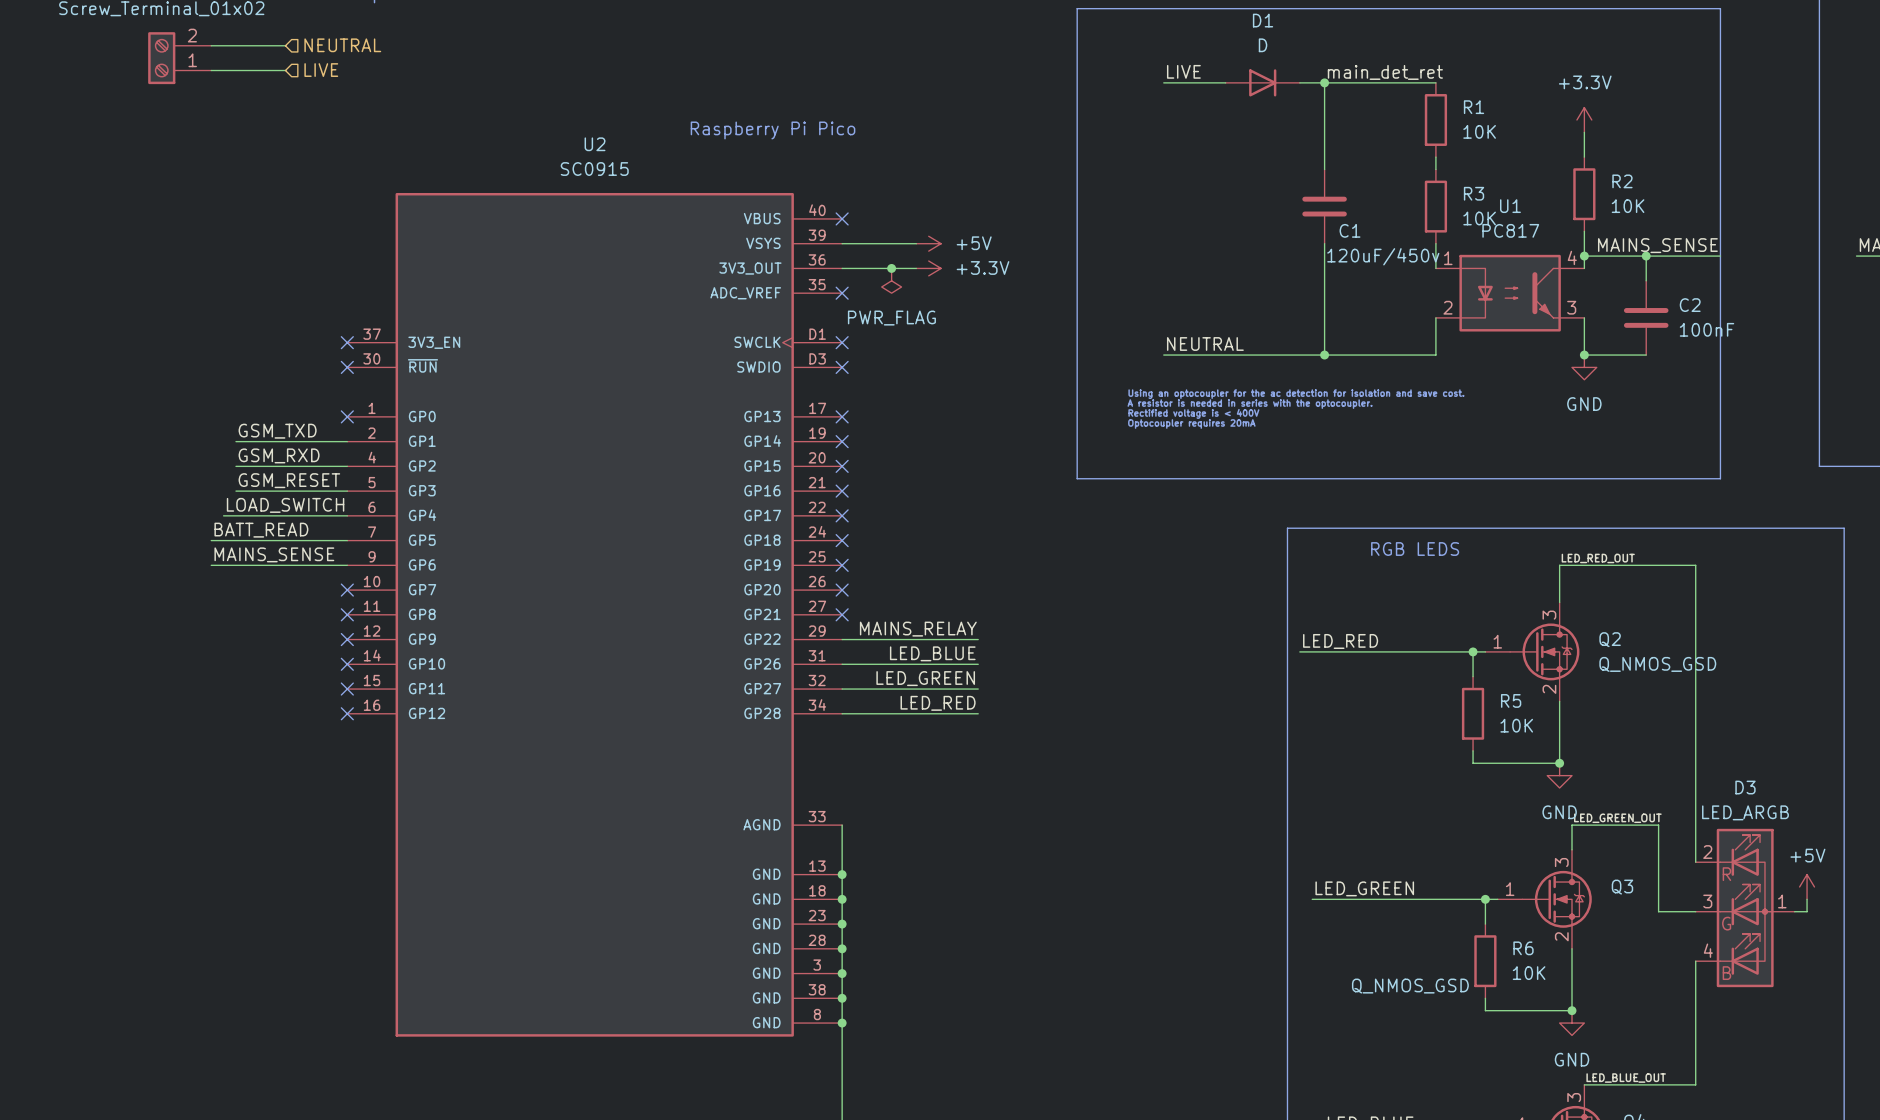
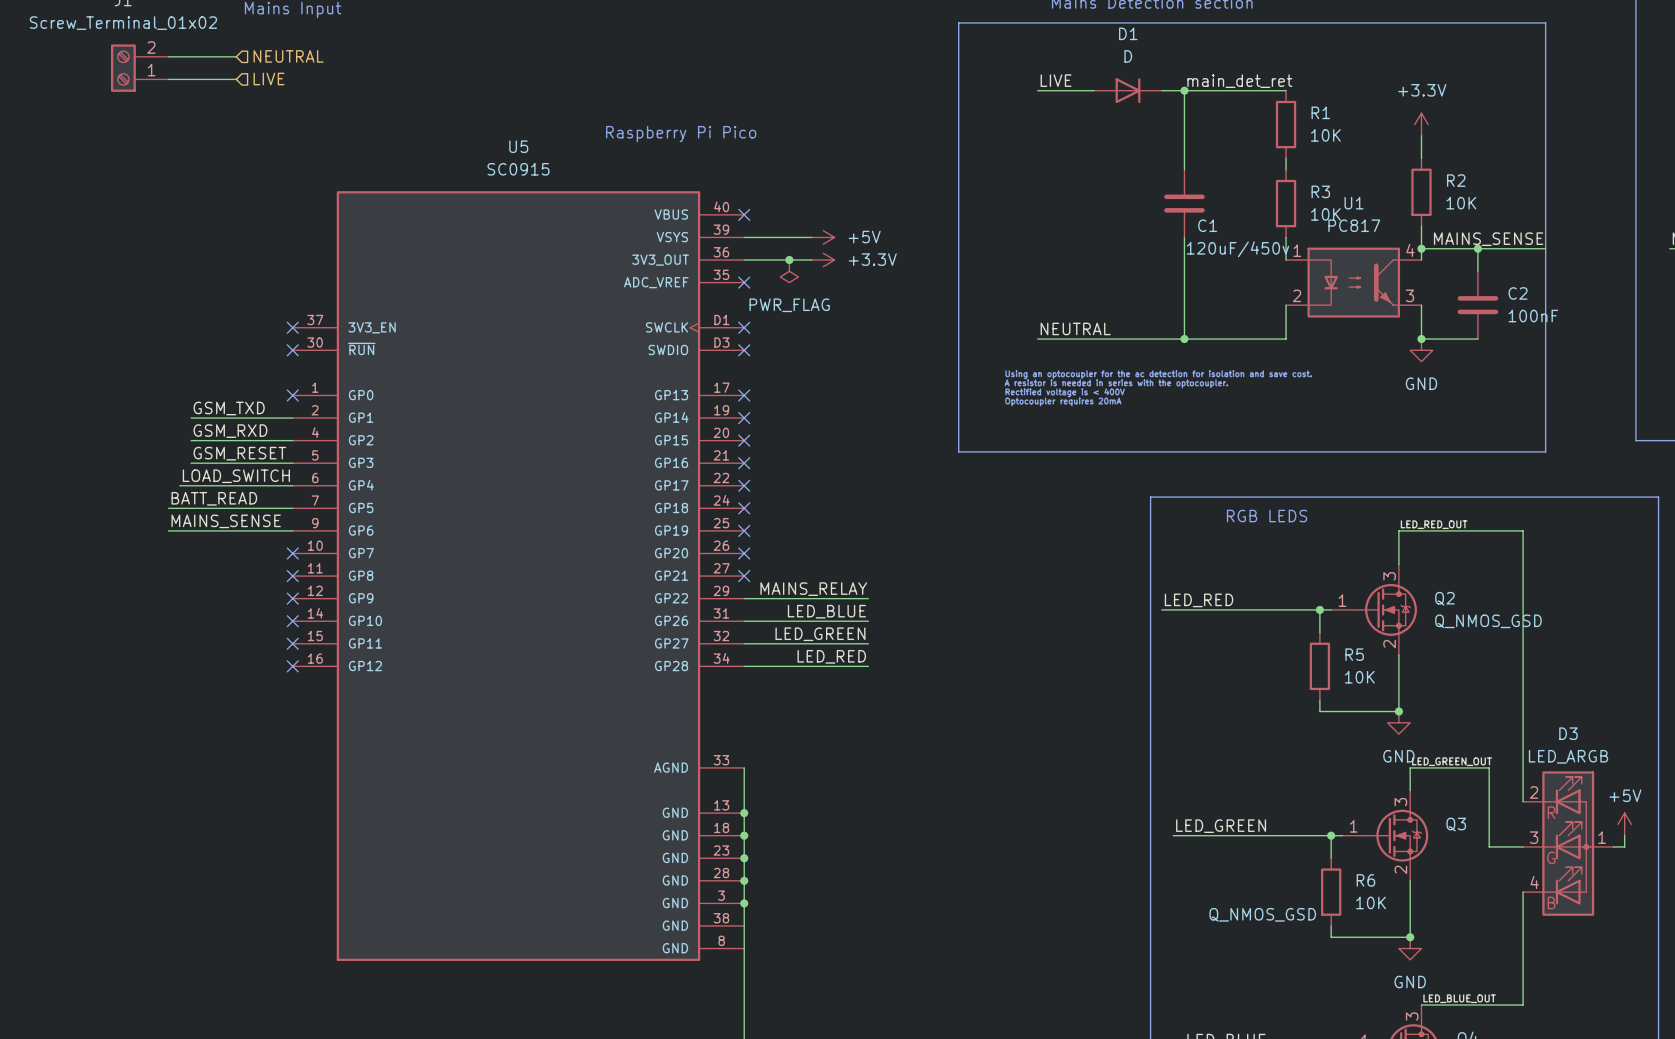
U2 name: U2 (595, 144) -> U5 (518, 146)
junction: (842, 998) -> none
junction: (842, 1023) -> none

